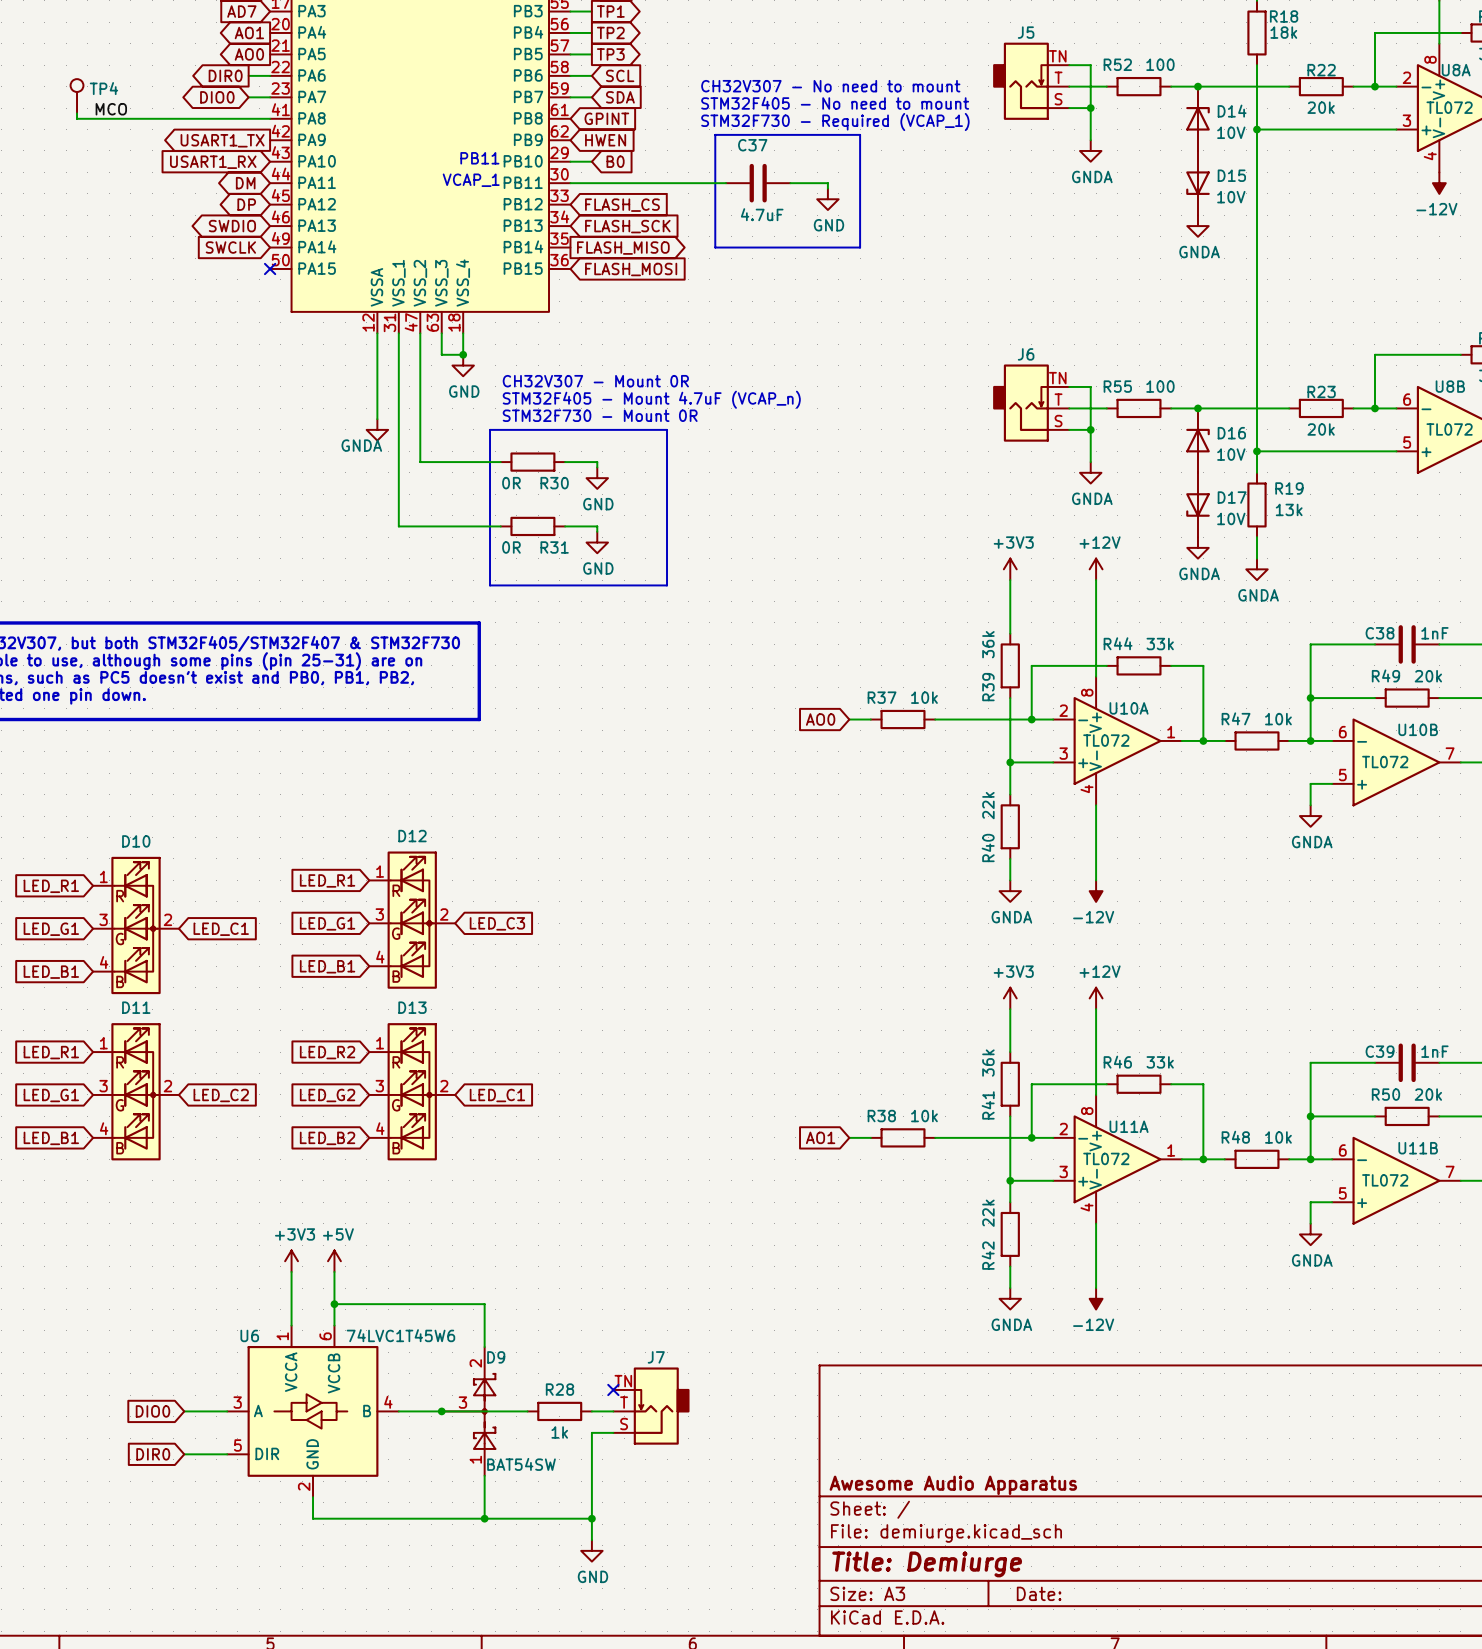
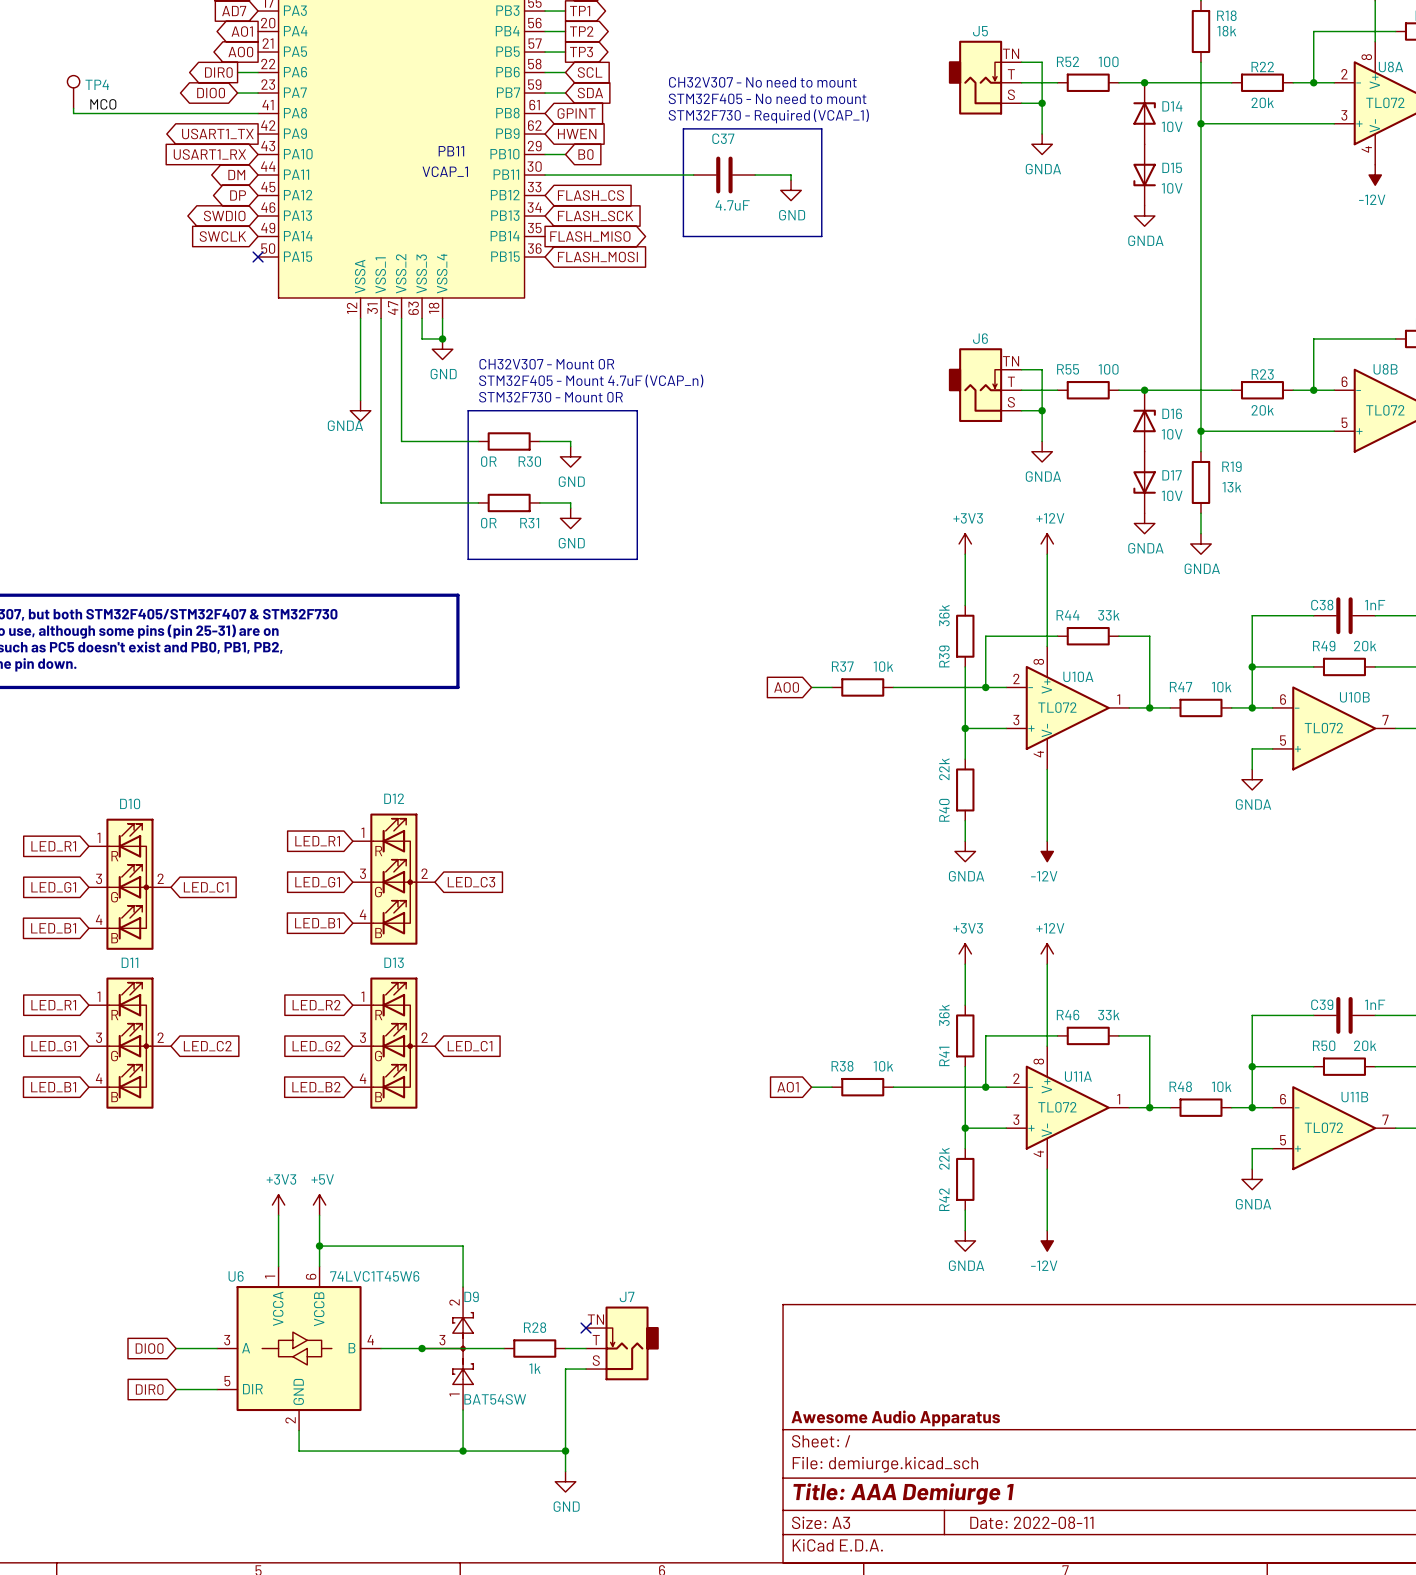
title block: Title: Demiurge (927, 1564) -> Title: AAA Demiurge 1 (903, 1493)
title block: Date: (1039, 1593) -> Date: 2022-08-11 (1031, 1522)

